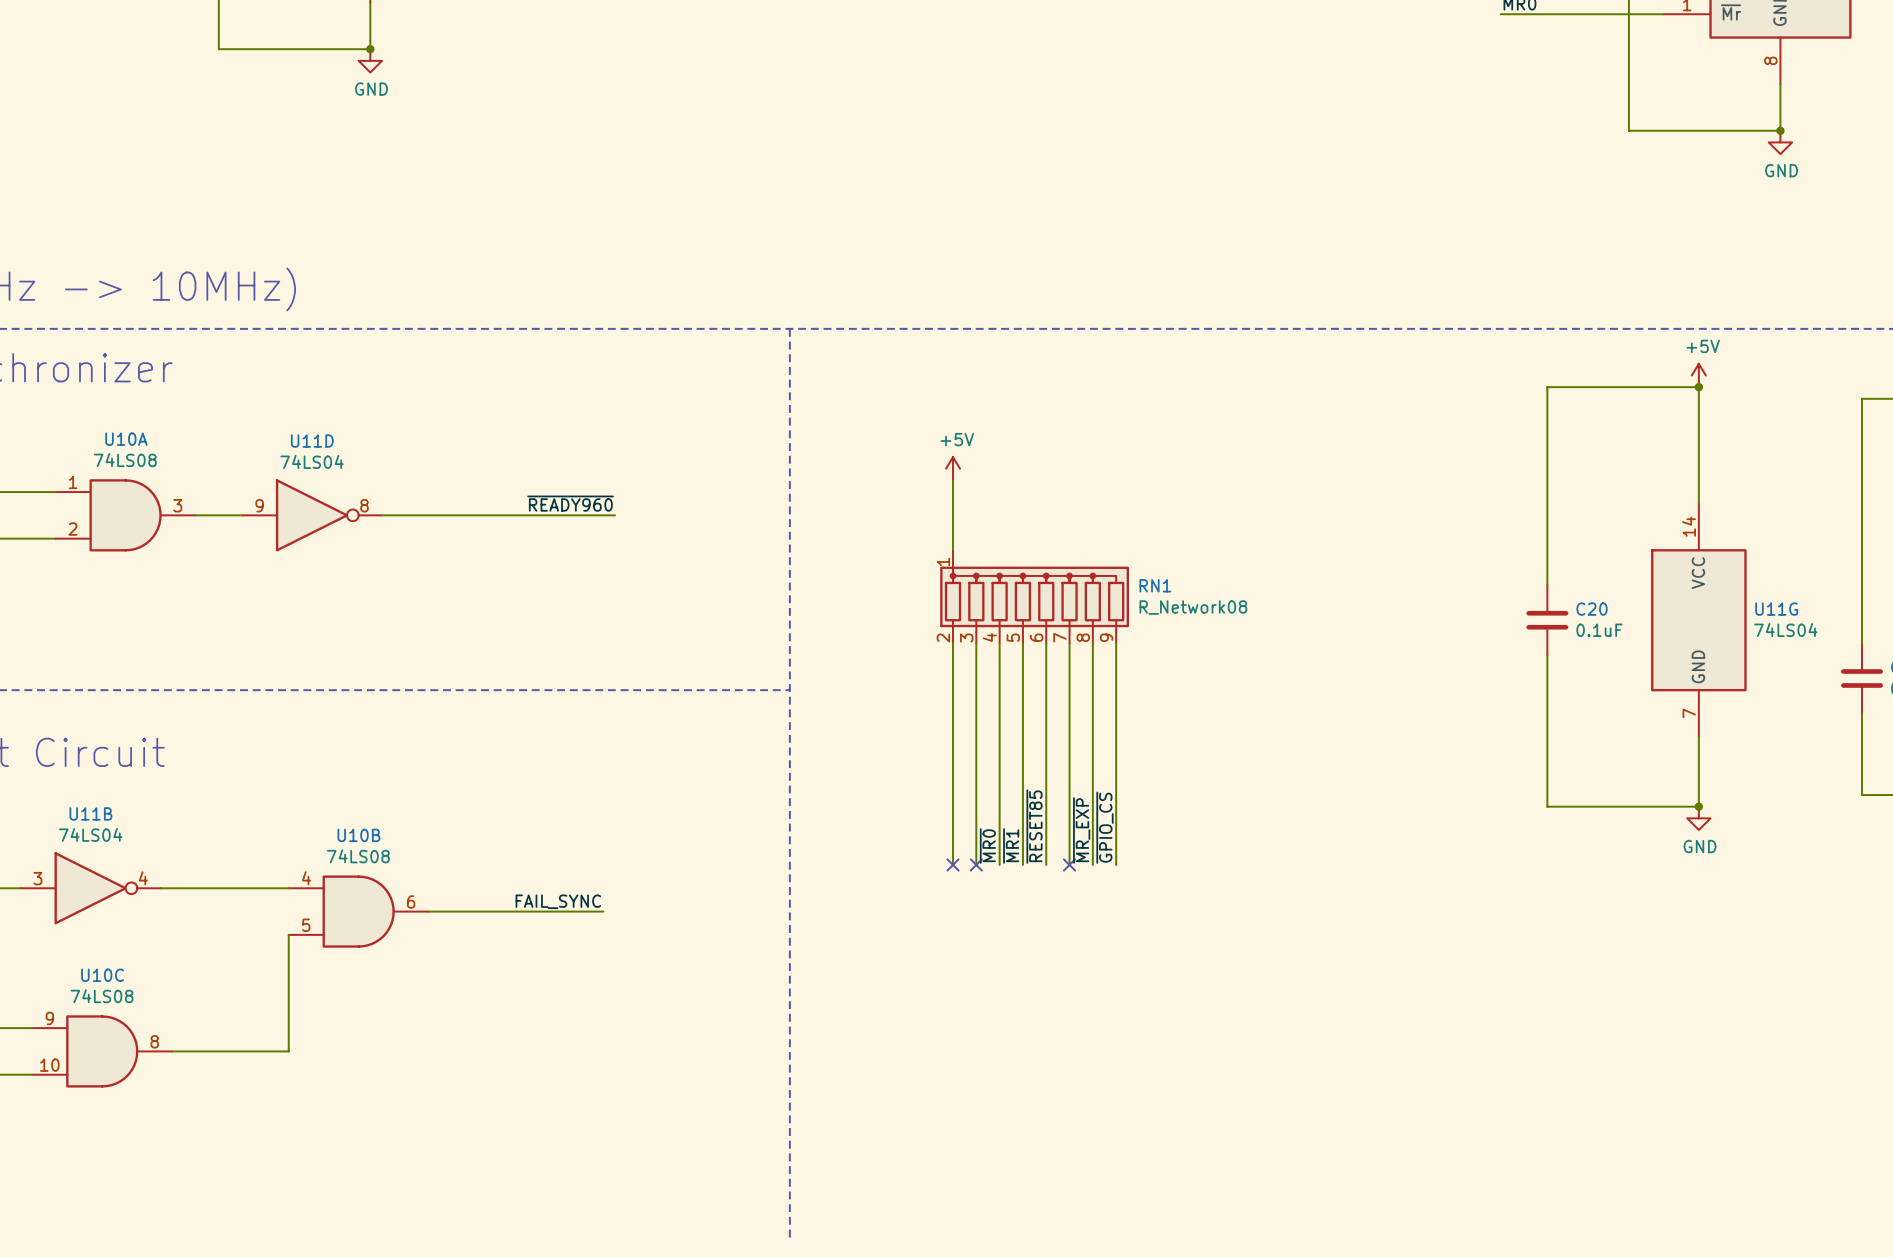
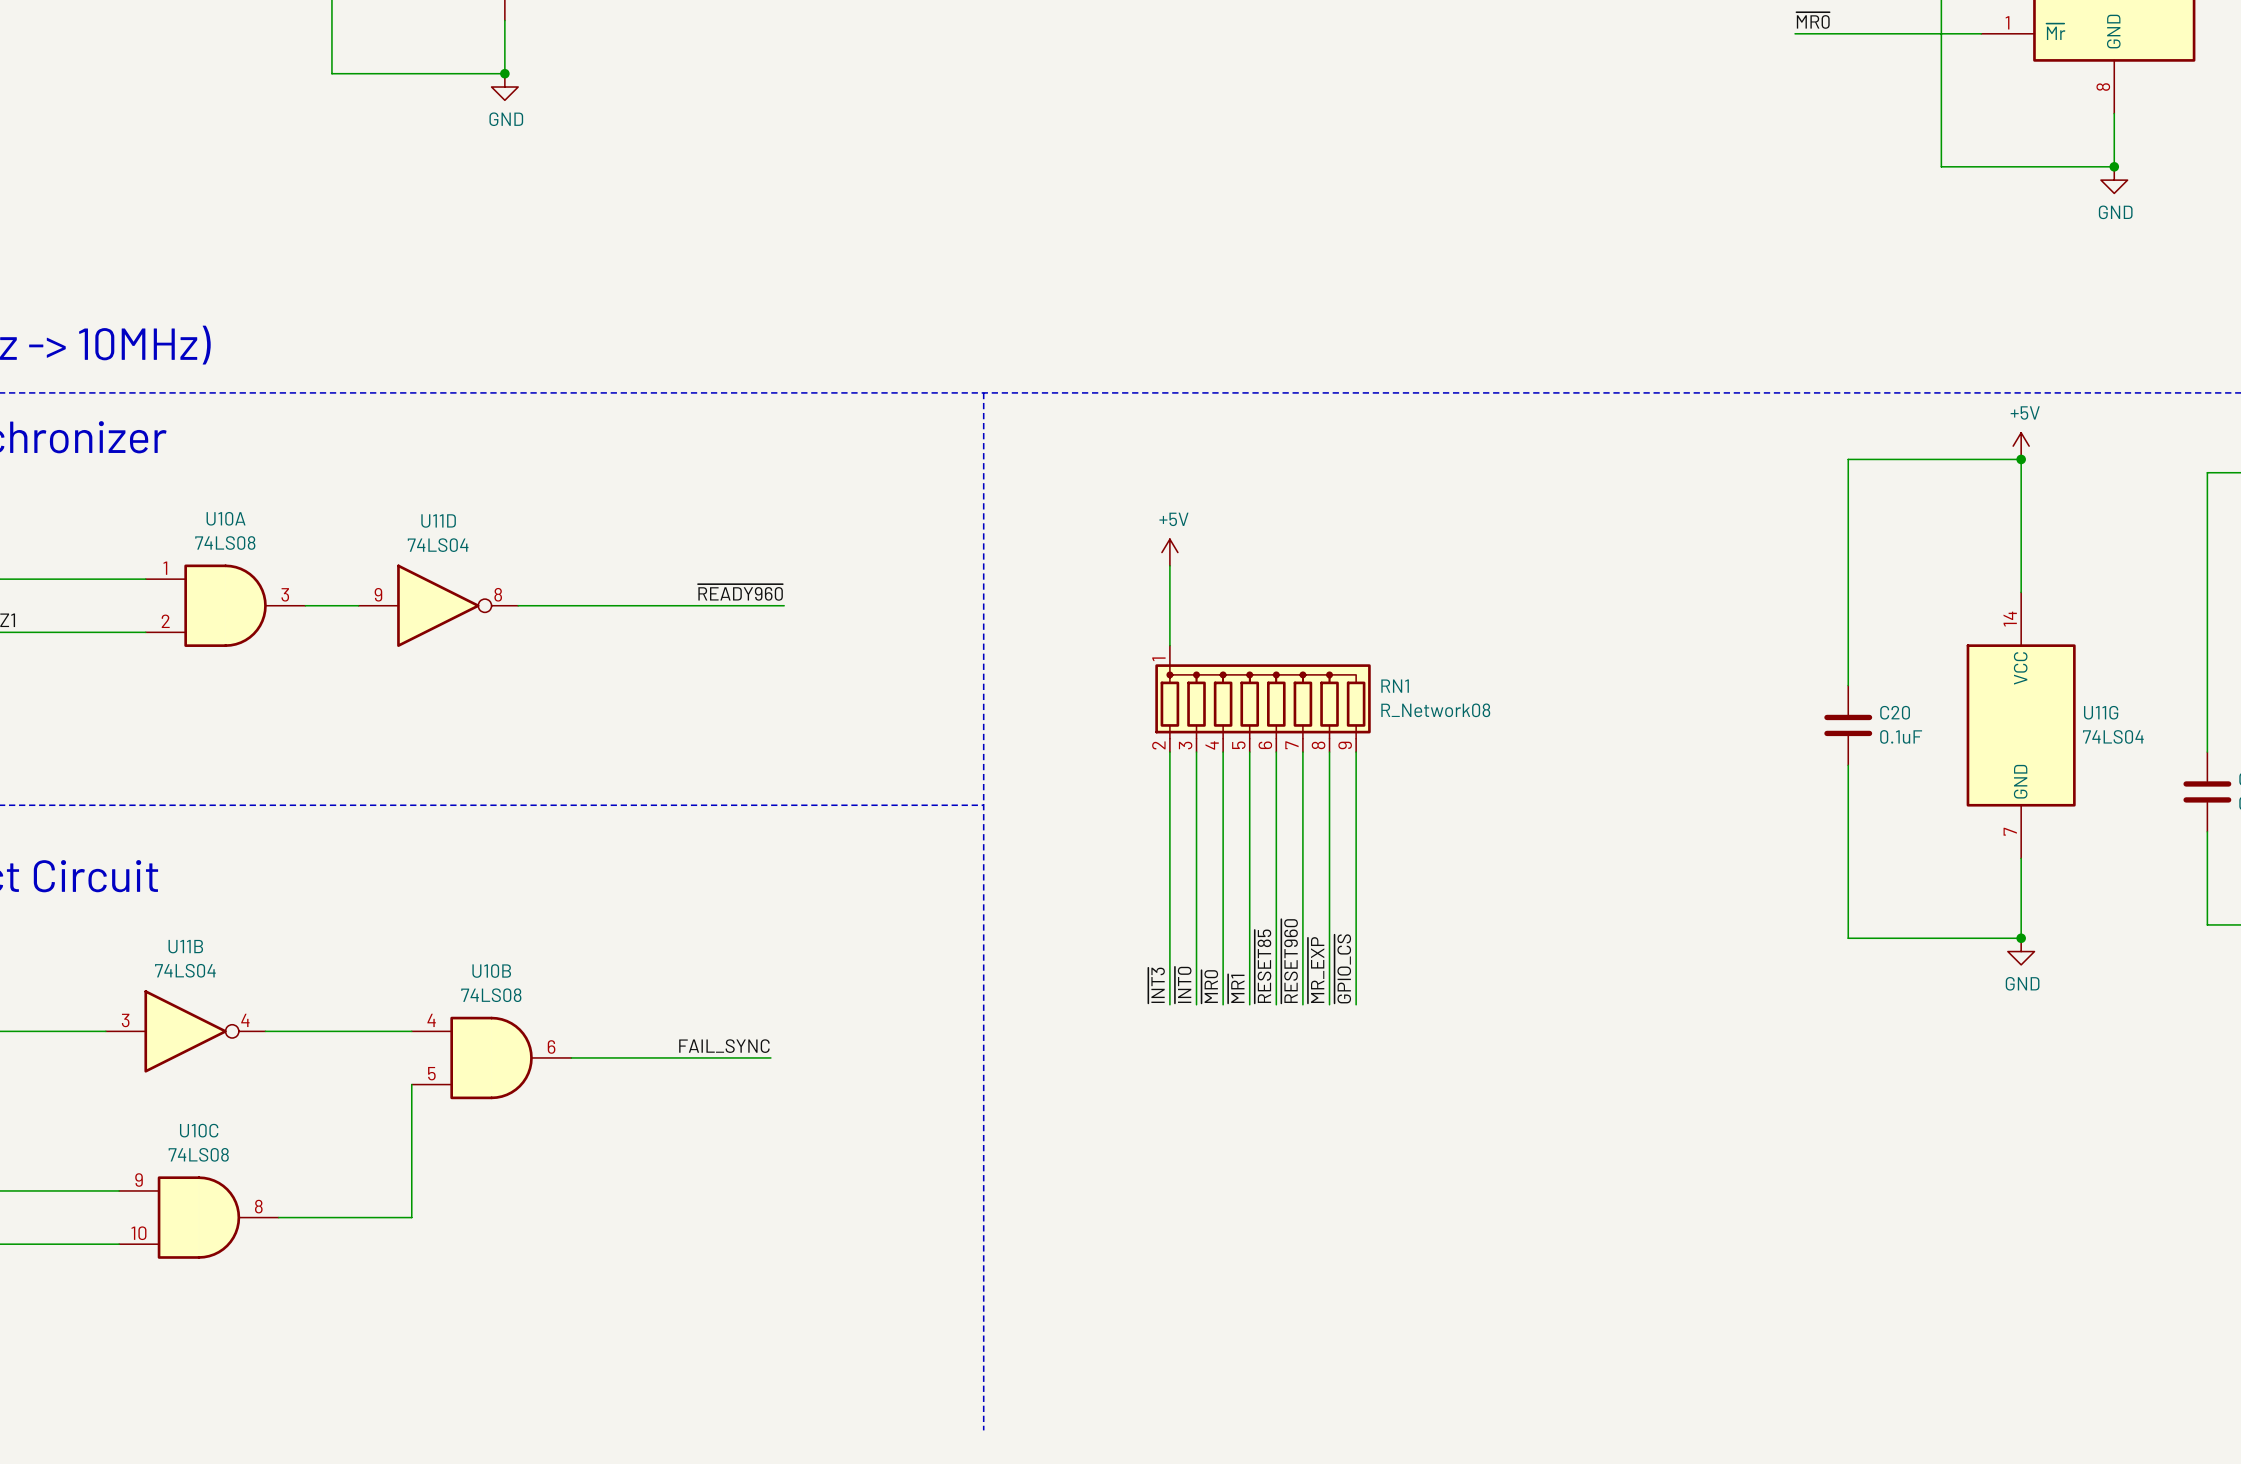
label: none -> ~{RESET960} (1289, 961)
label: none -> ~{INT3} (1156, 985)
label: none -> ~{INT0} (1183, 985)
no-connect mark: (953, 864) -> none
no-connect mark: (976, 864) -> none
no-connect mark: (1069, 864) -> none

